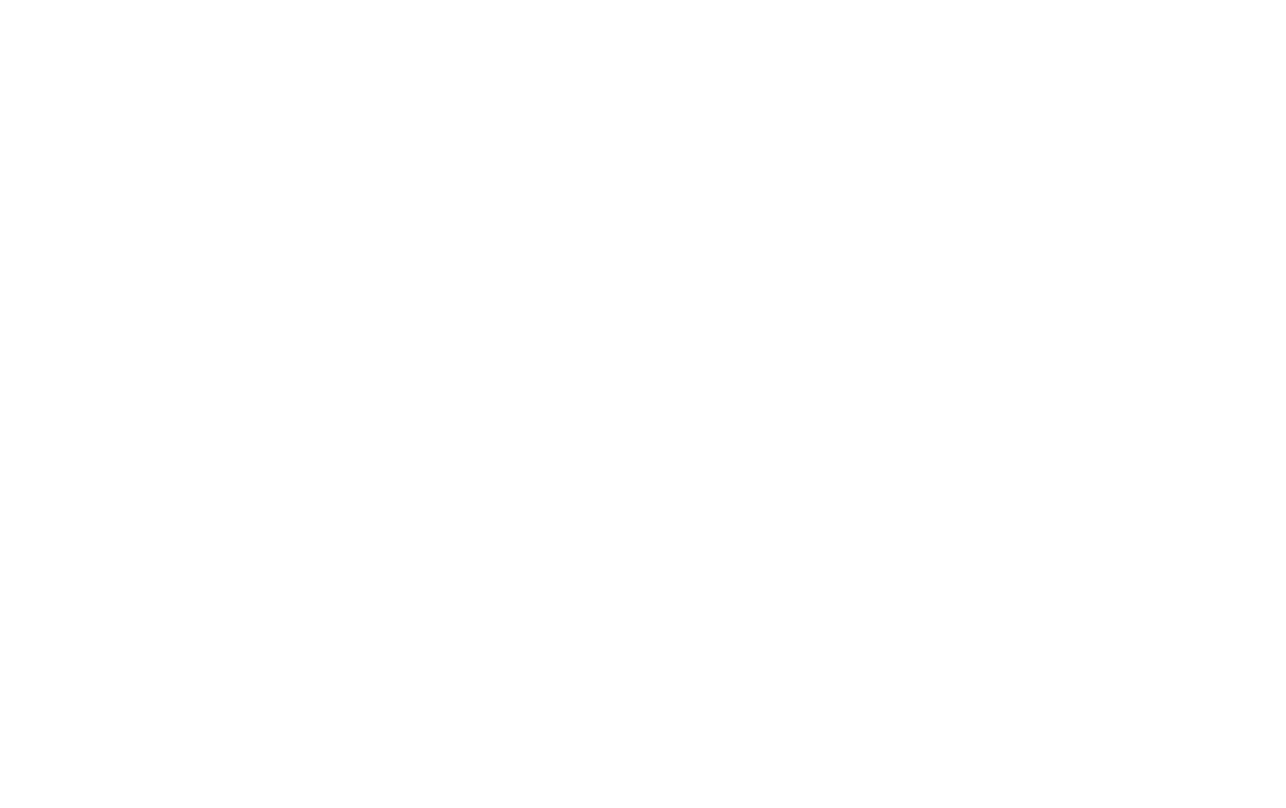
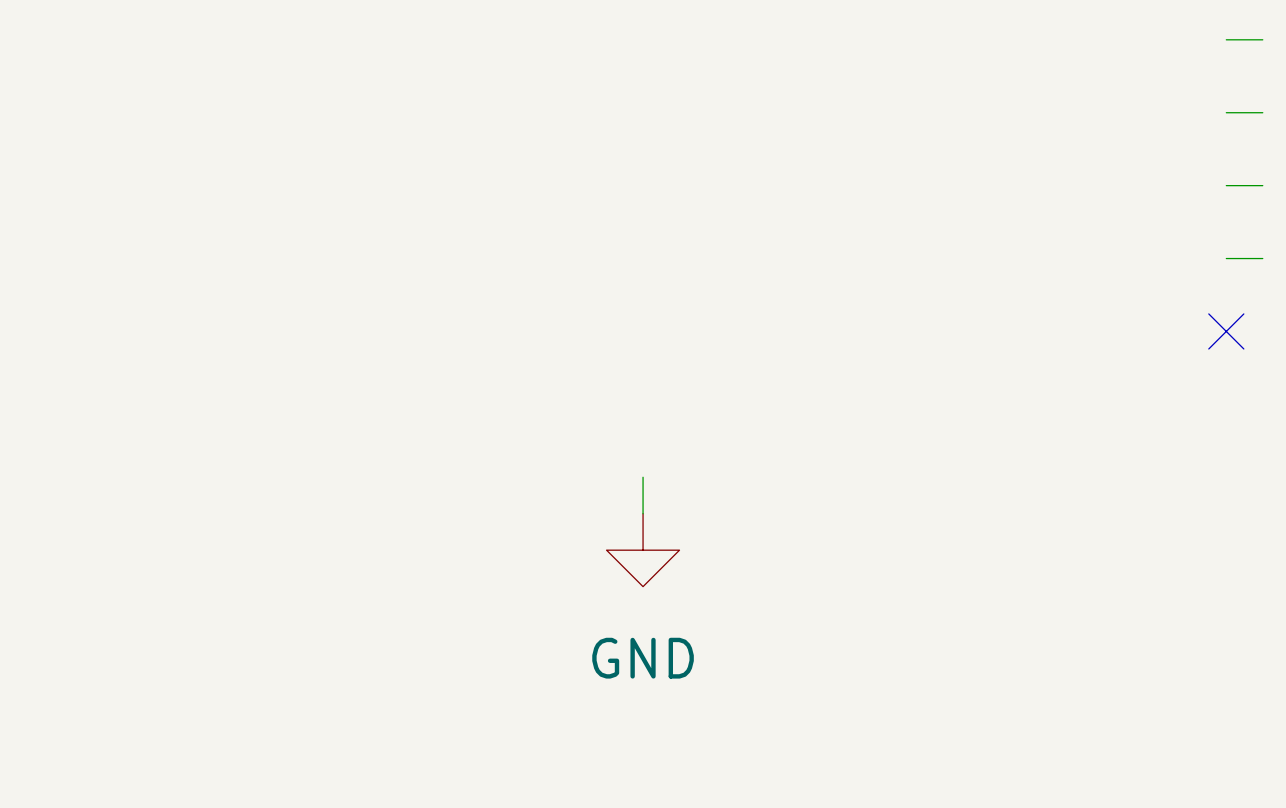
wire: none -> (1226, 39) (1262, 39)
wire: none -> (1226, 112) (1262, 112)
wire: none -> (1226, 185) (1262, 185)
wire: none -> (1226, 258) (1262, 258)
no-connect mark: none -> (1226, 331)
wire: none -> (643, 477) (643, 513)
power symbol: none -> GND (643, 550)

